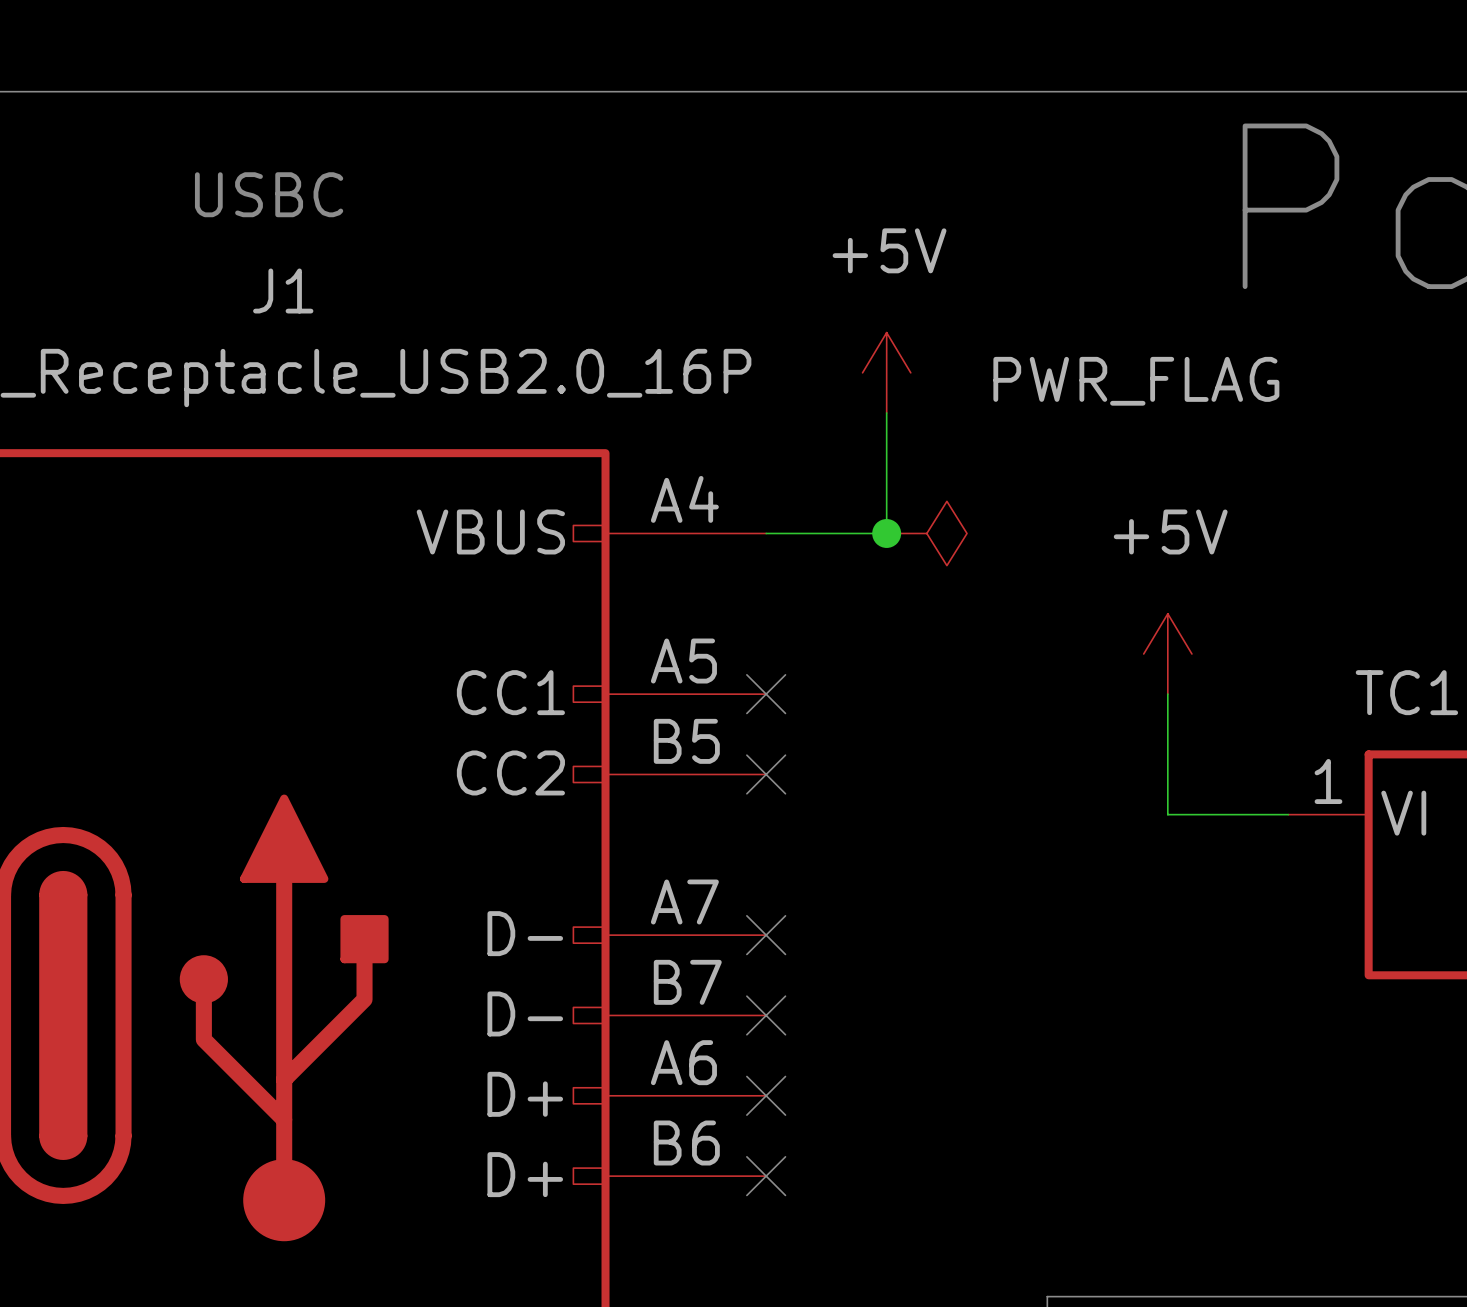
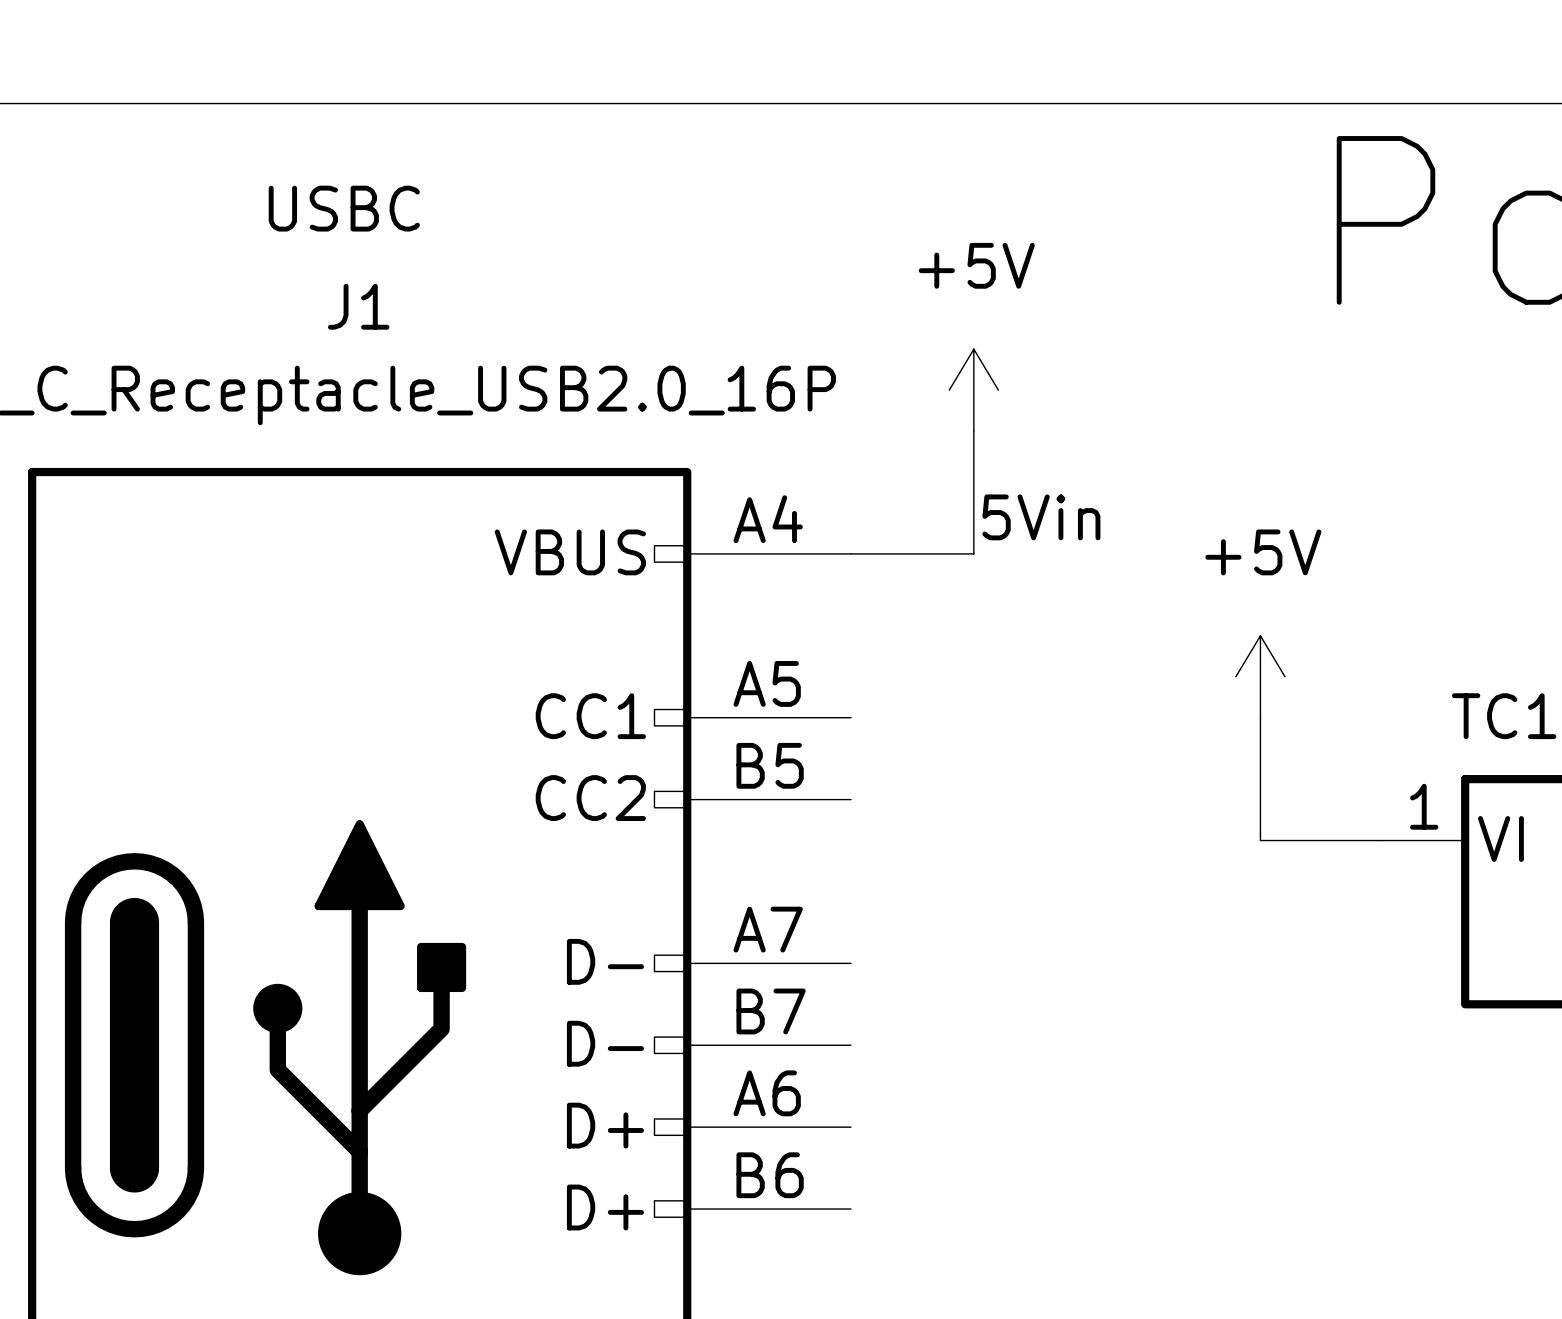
label: none -> 5Vin (1041, 517)
junction: (886, 533) -> none
power symbol: PWR_FLAG (926, 533) -> none
no-connect mark: (766, 694) -> none
no-connect mark: (766, 774) -> none
no-connect mark: (766, 935) -> none
no-connect mark: (766, 1015) -> none
no-connect mark: (766, 1095) -> none
no-connect mark: (766, 1176) -> none

